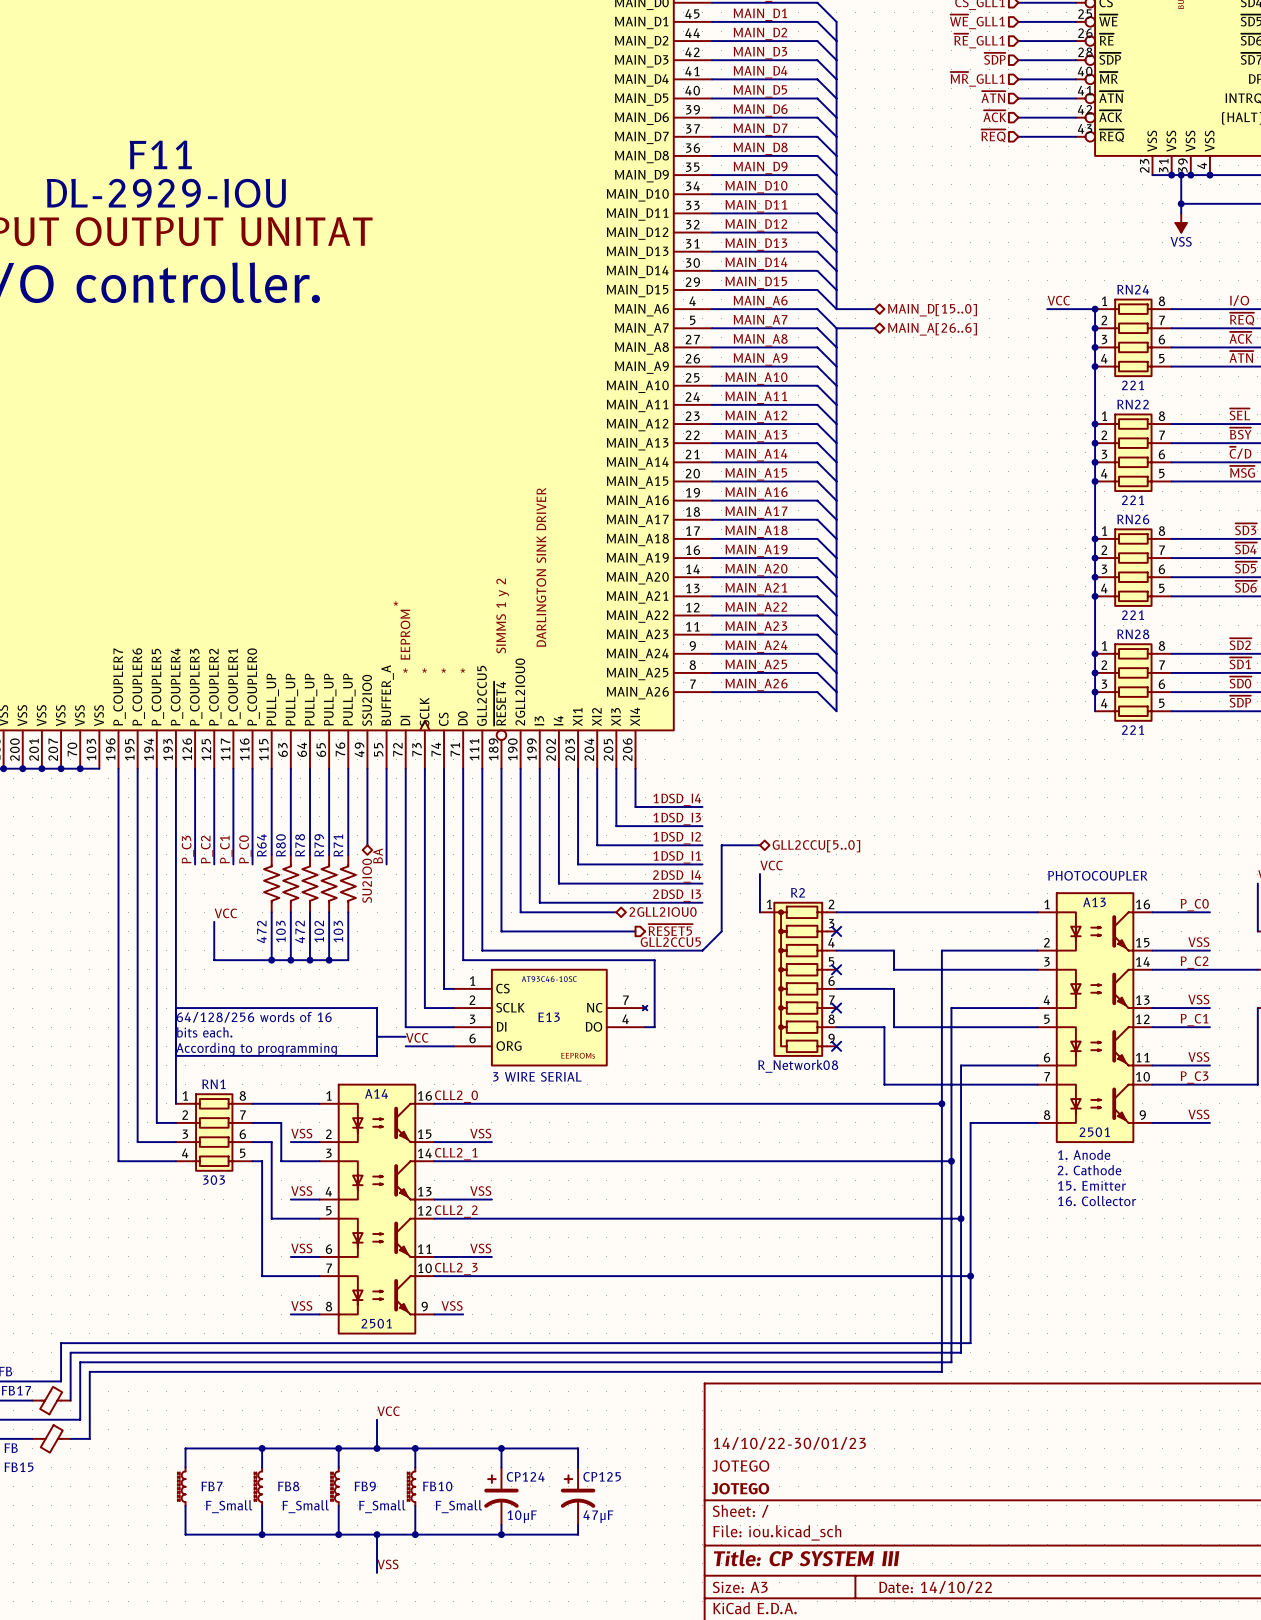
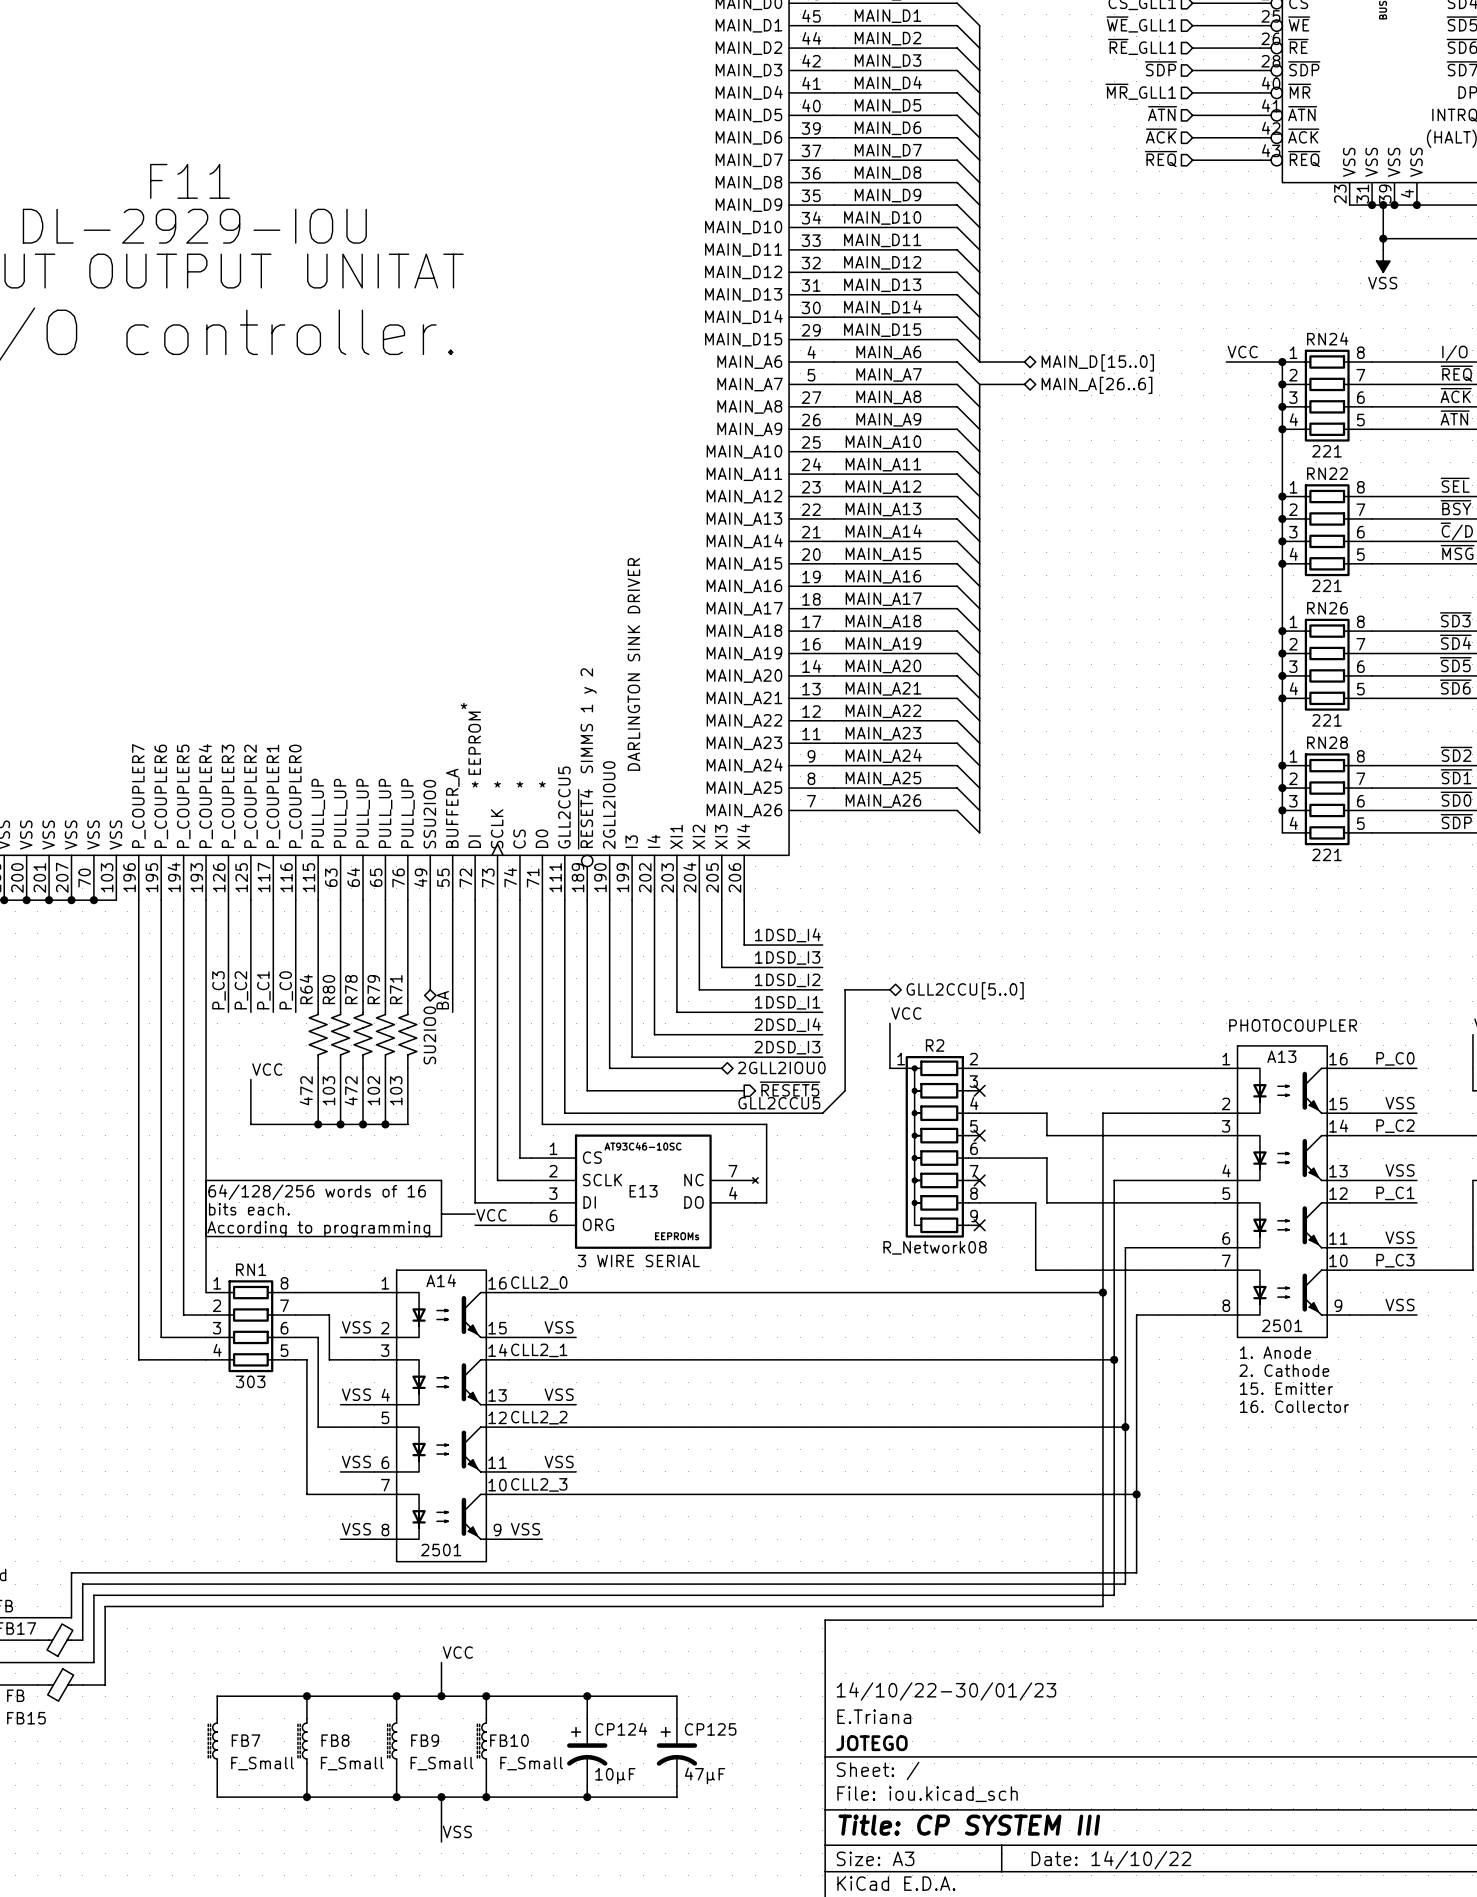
title block: JOTEGO (740, 1466) -> E.Triana (874, 1716)

